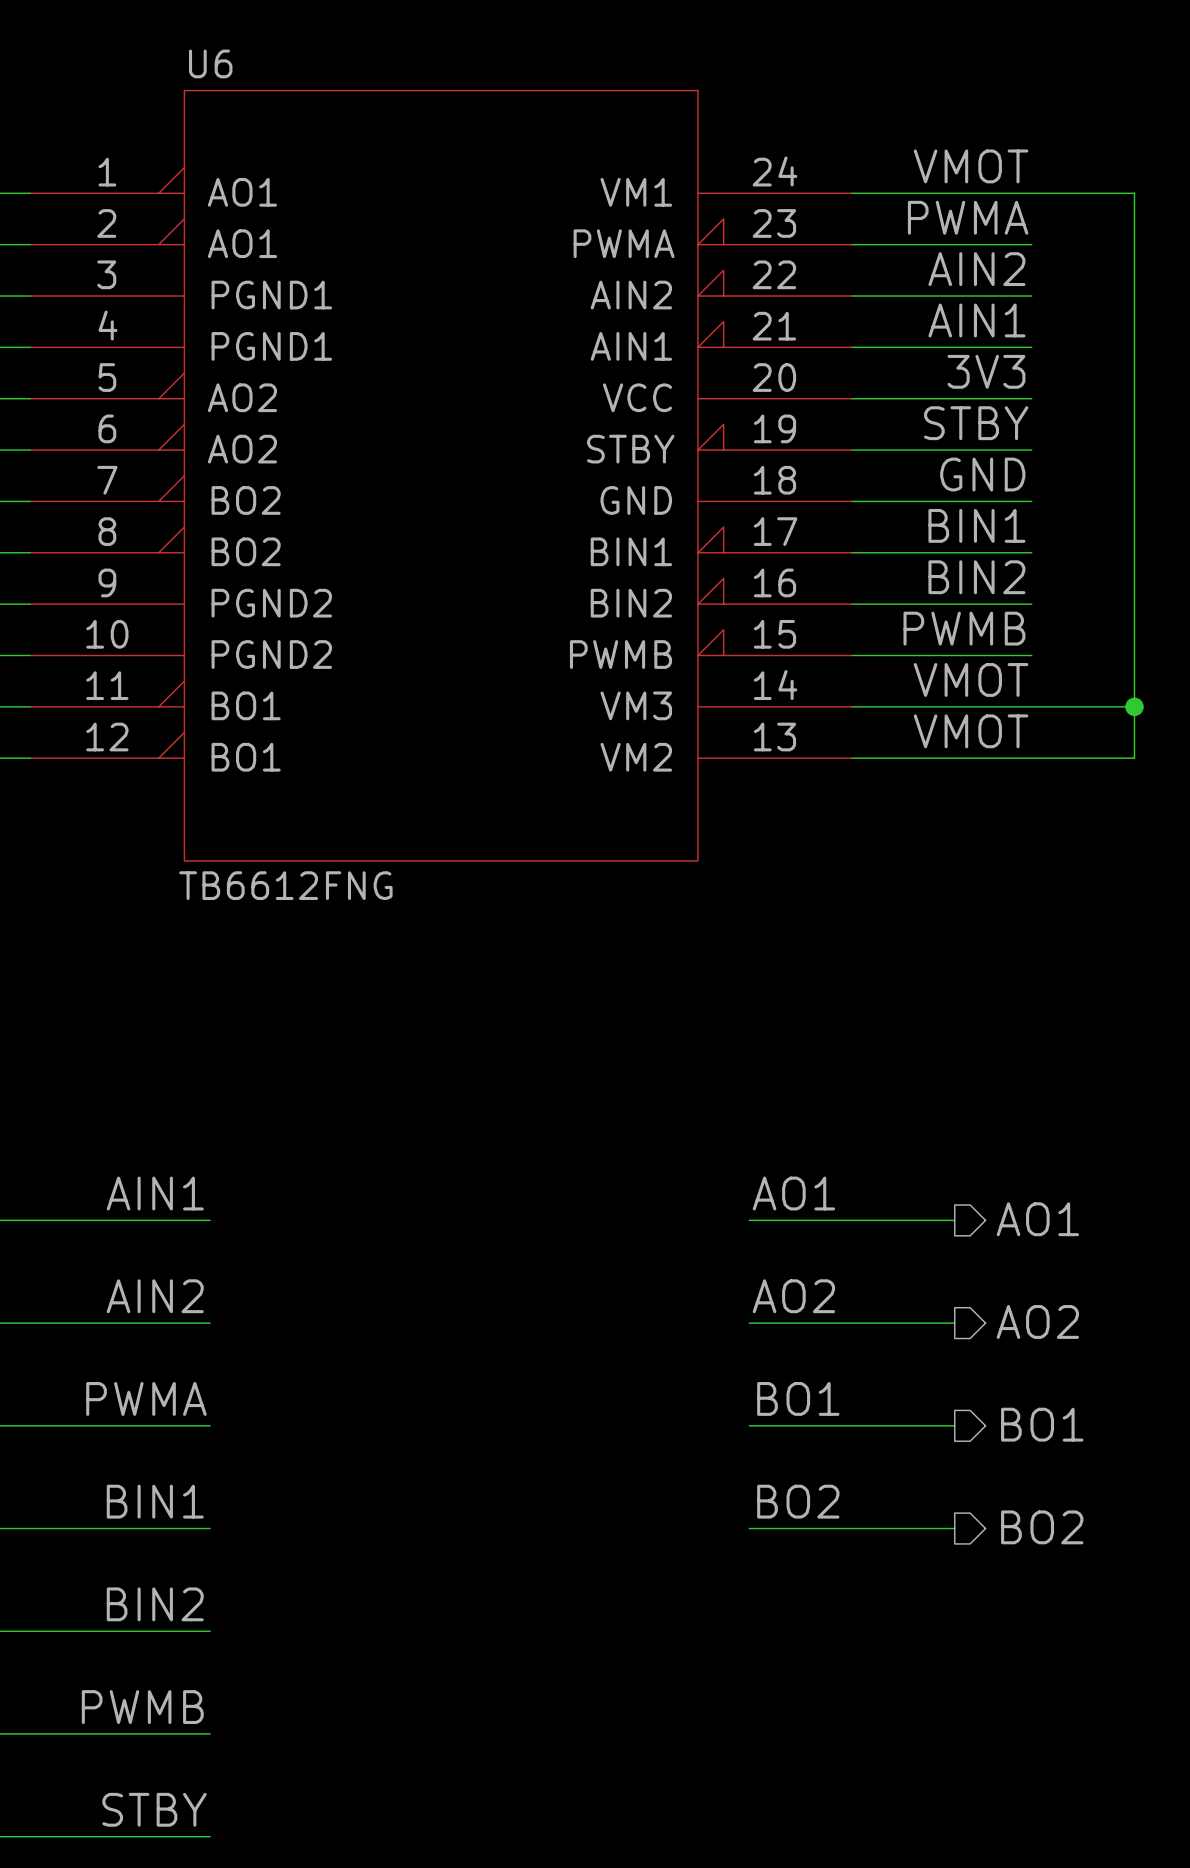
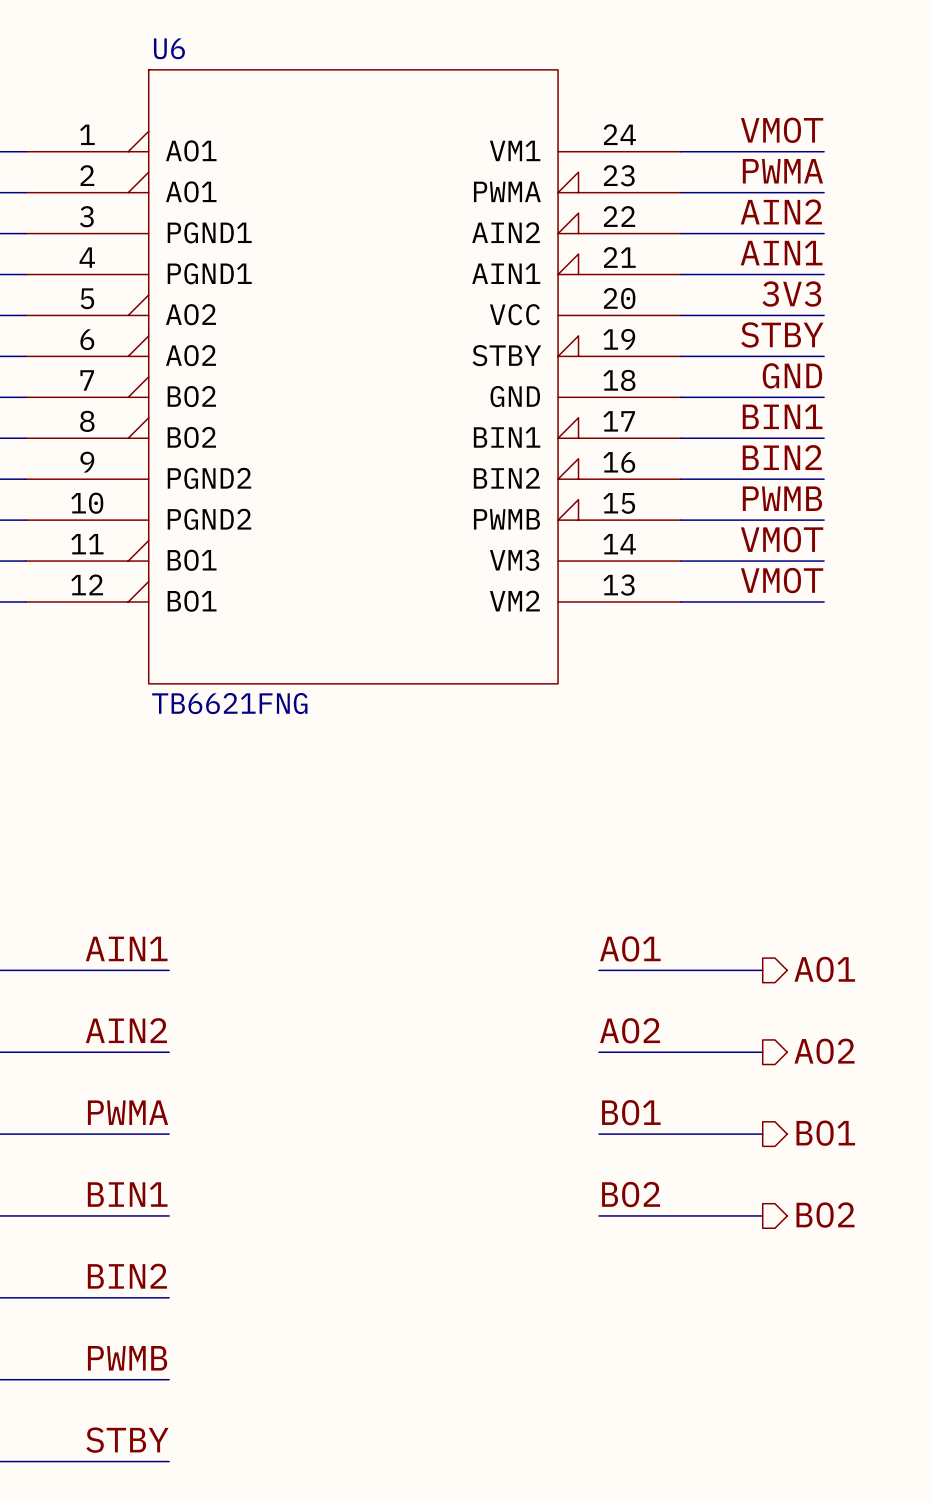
wire: (1031, 193) (1134, 193) (1134, 758) (1031, 758) -> none
wire: (1031, 706) (1134, 706) -> none
junction: (1134, 706) -> none
U6 value: TB6612FNG (285, 885) -> TB6621FNG (229, 703)

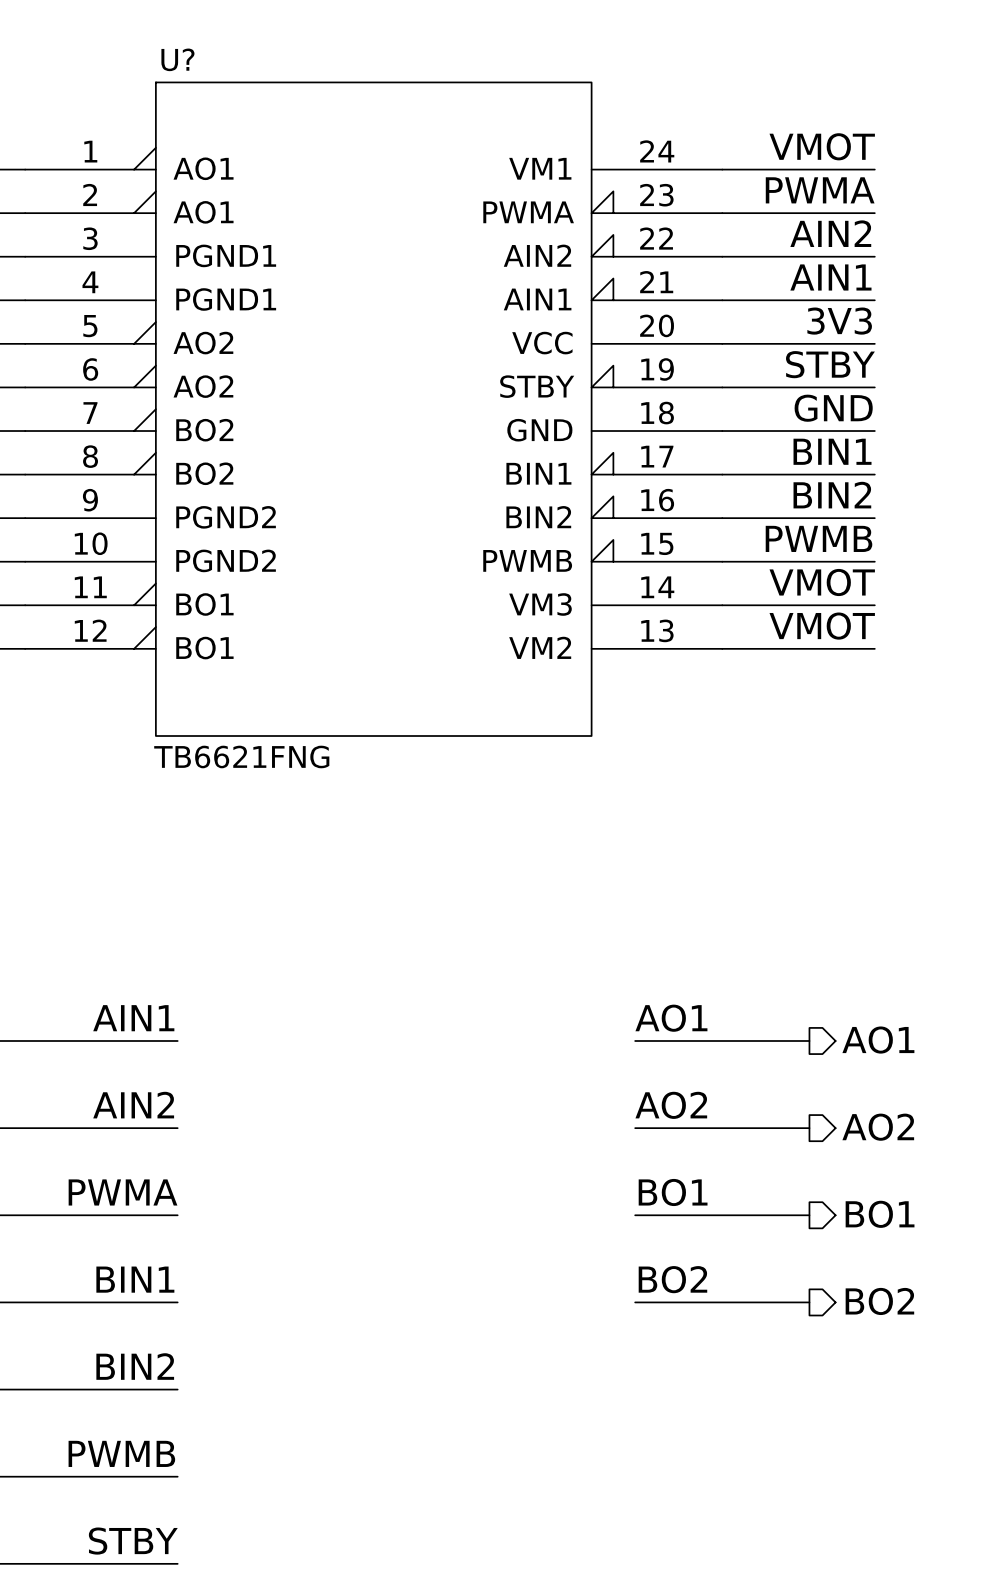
U6 name: U6 (169, 48) -> U? (177, 59)

